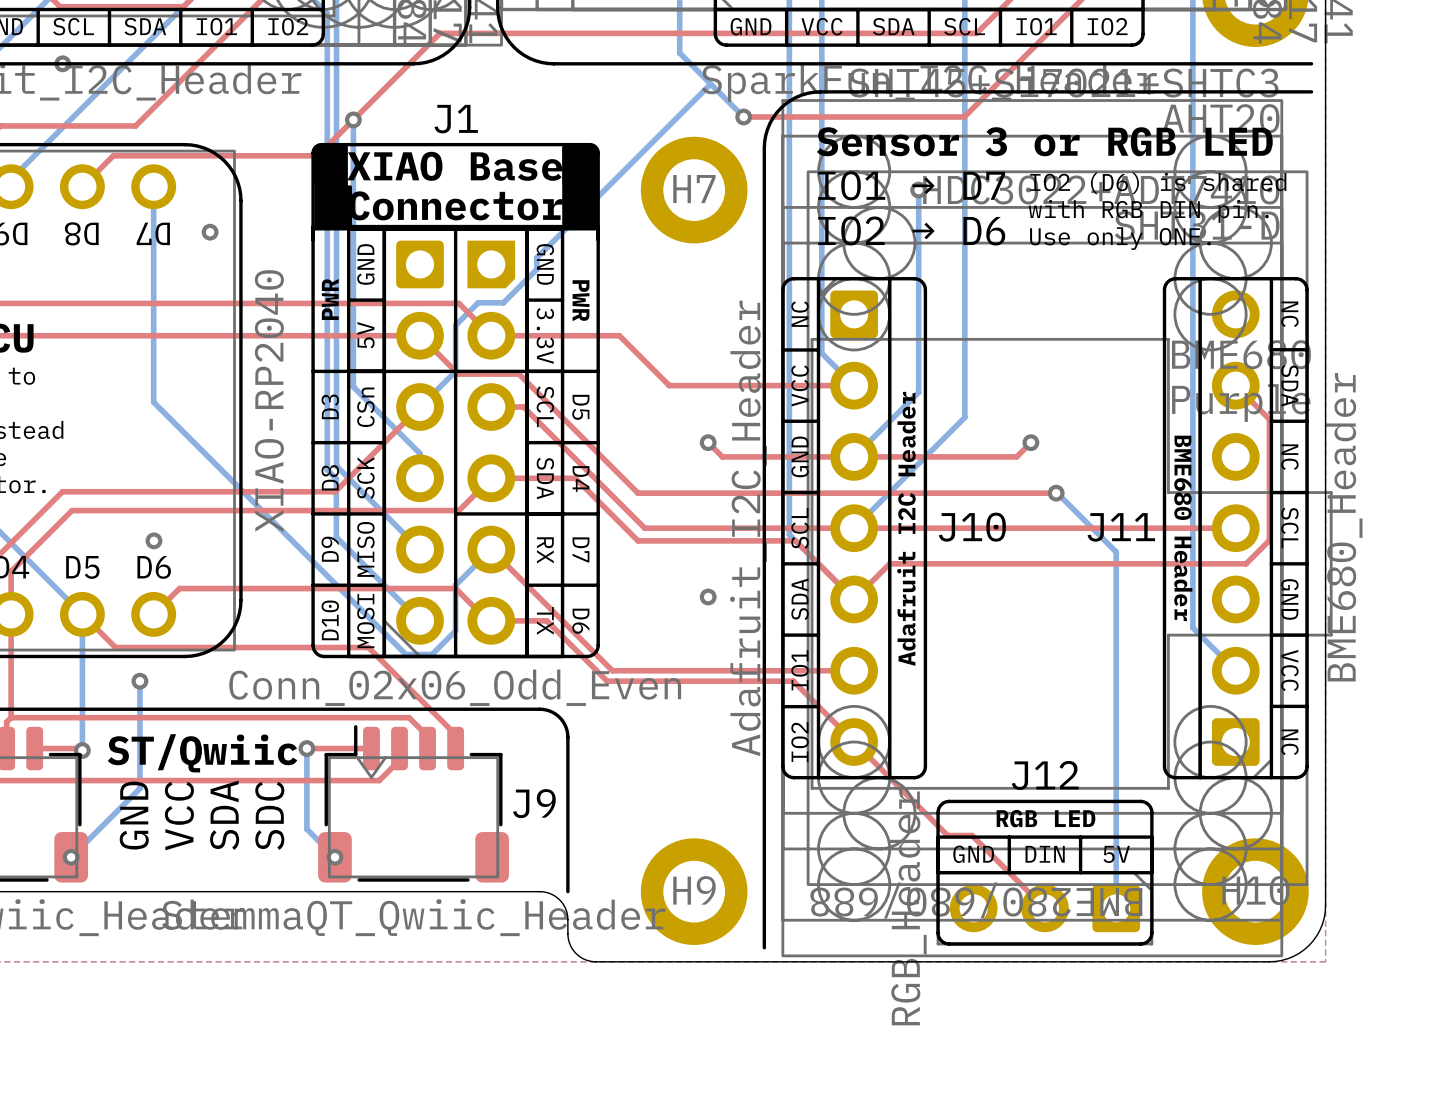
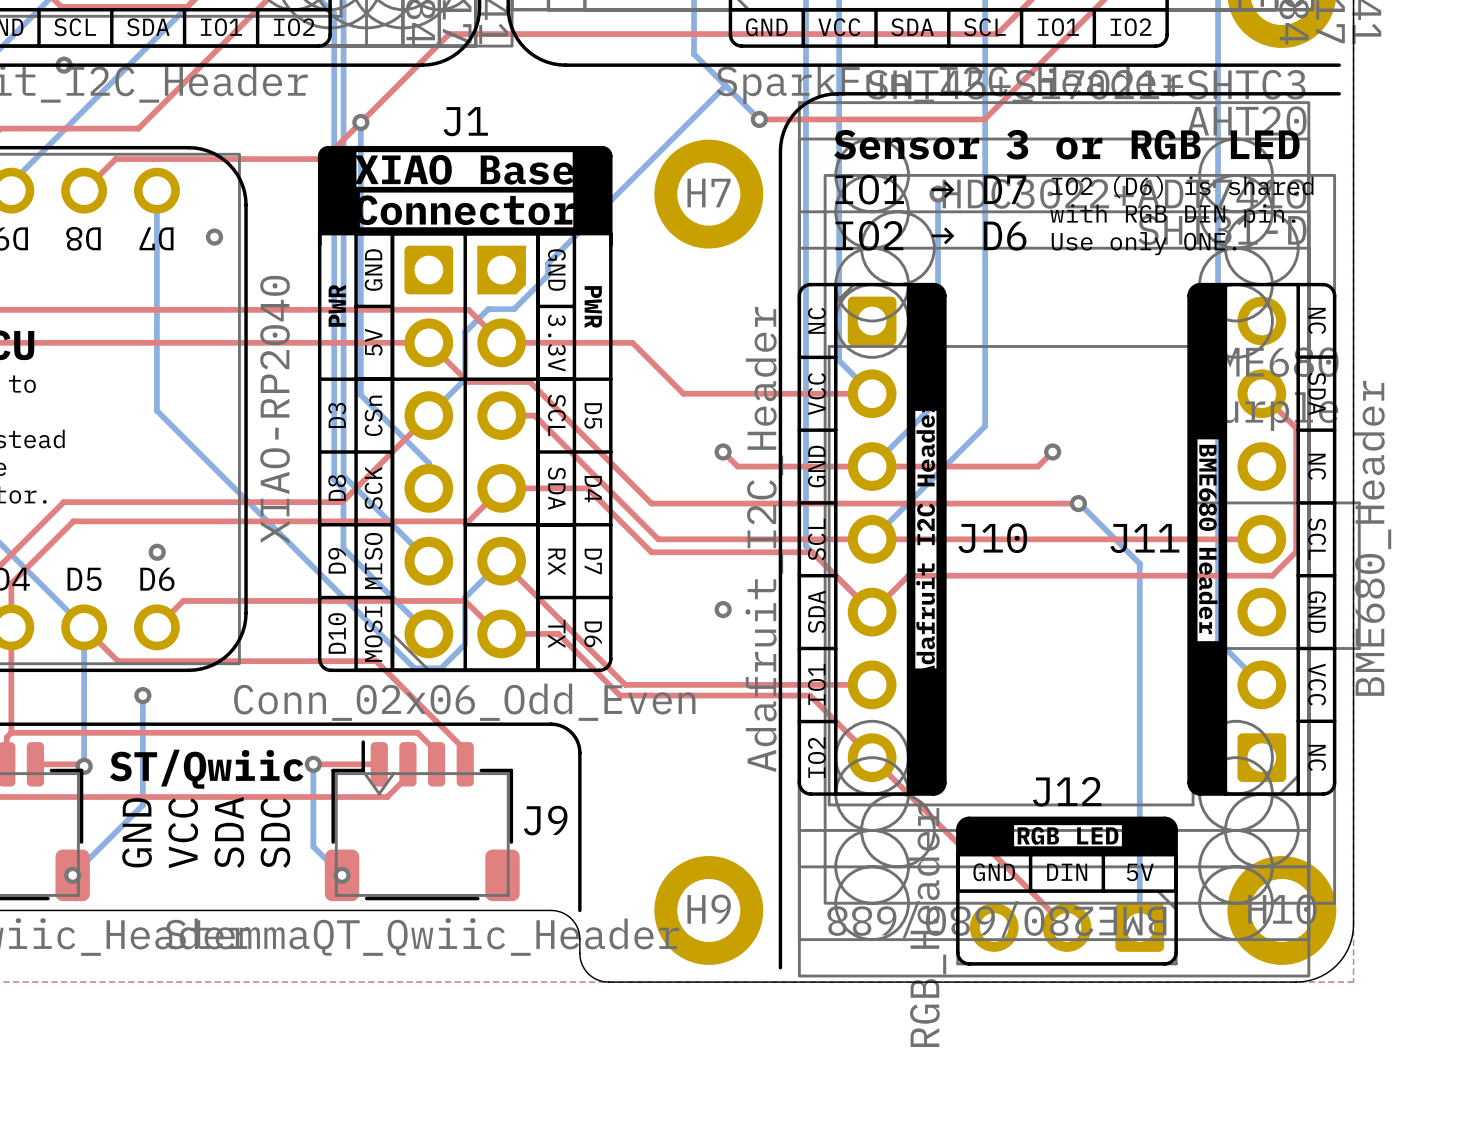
drawing: none -> [319, 147, 611, 234]
drawing: [313, 145, 352, 227] -> none
drawing: [562, 145, 599, 226] -> none
line: (313, 226) (598, 226) -> none
drawing: none -> [908, 284, 1226, 855]

